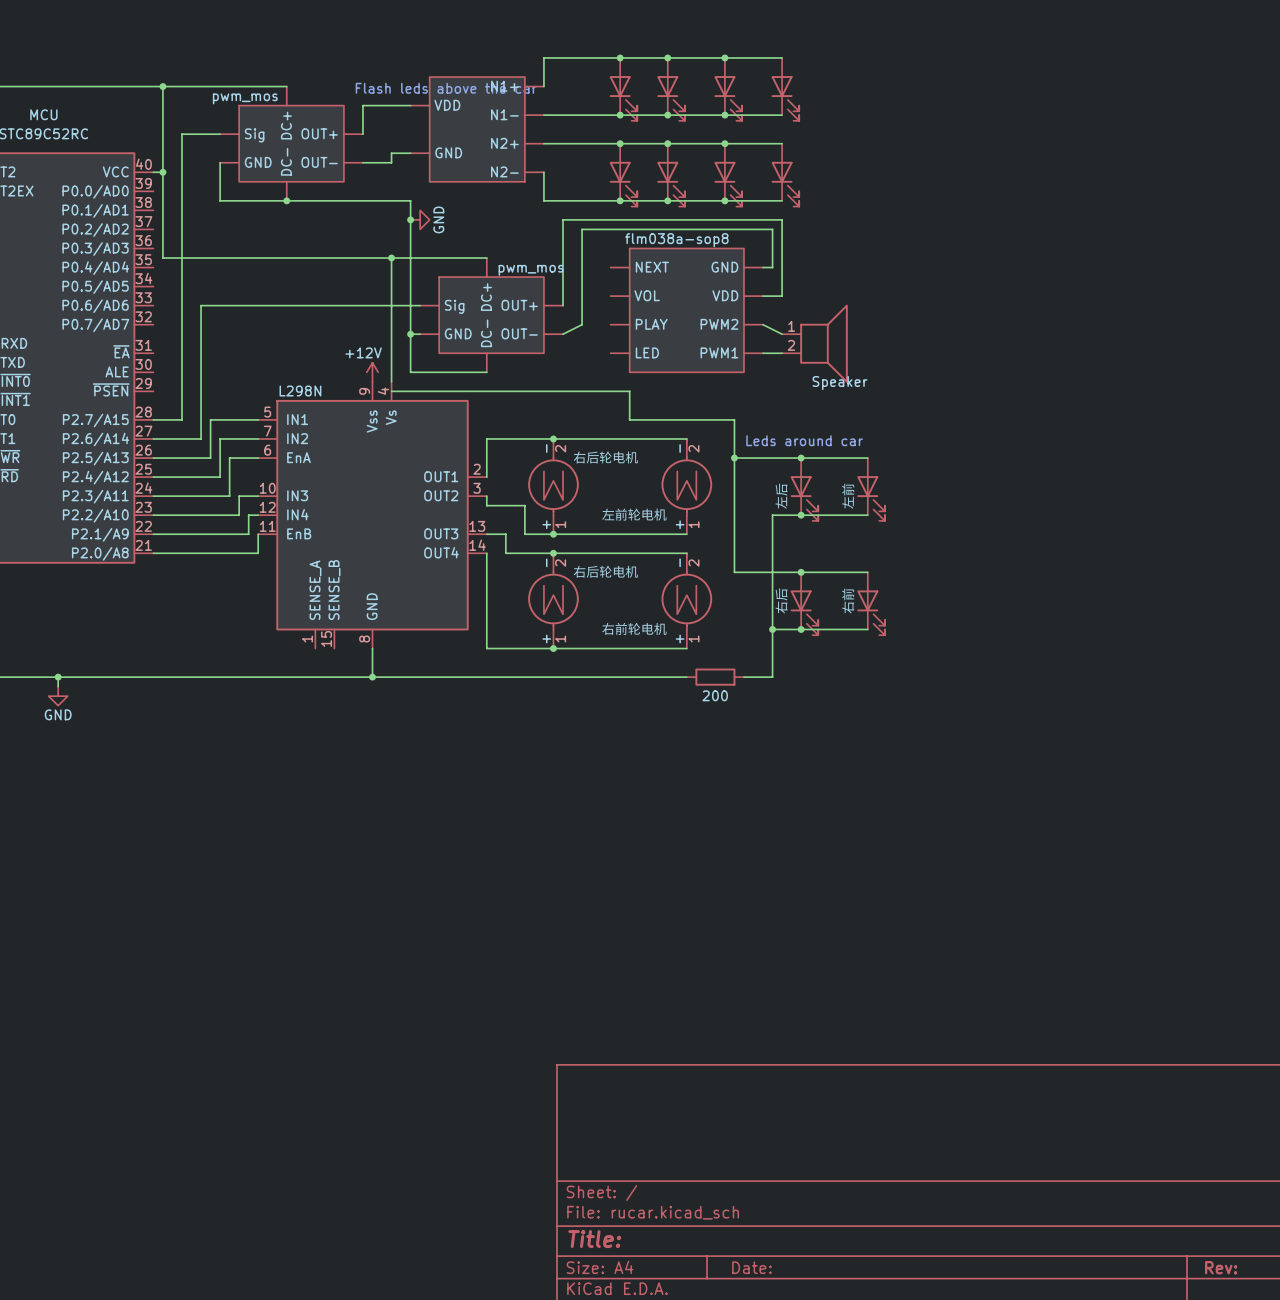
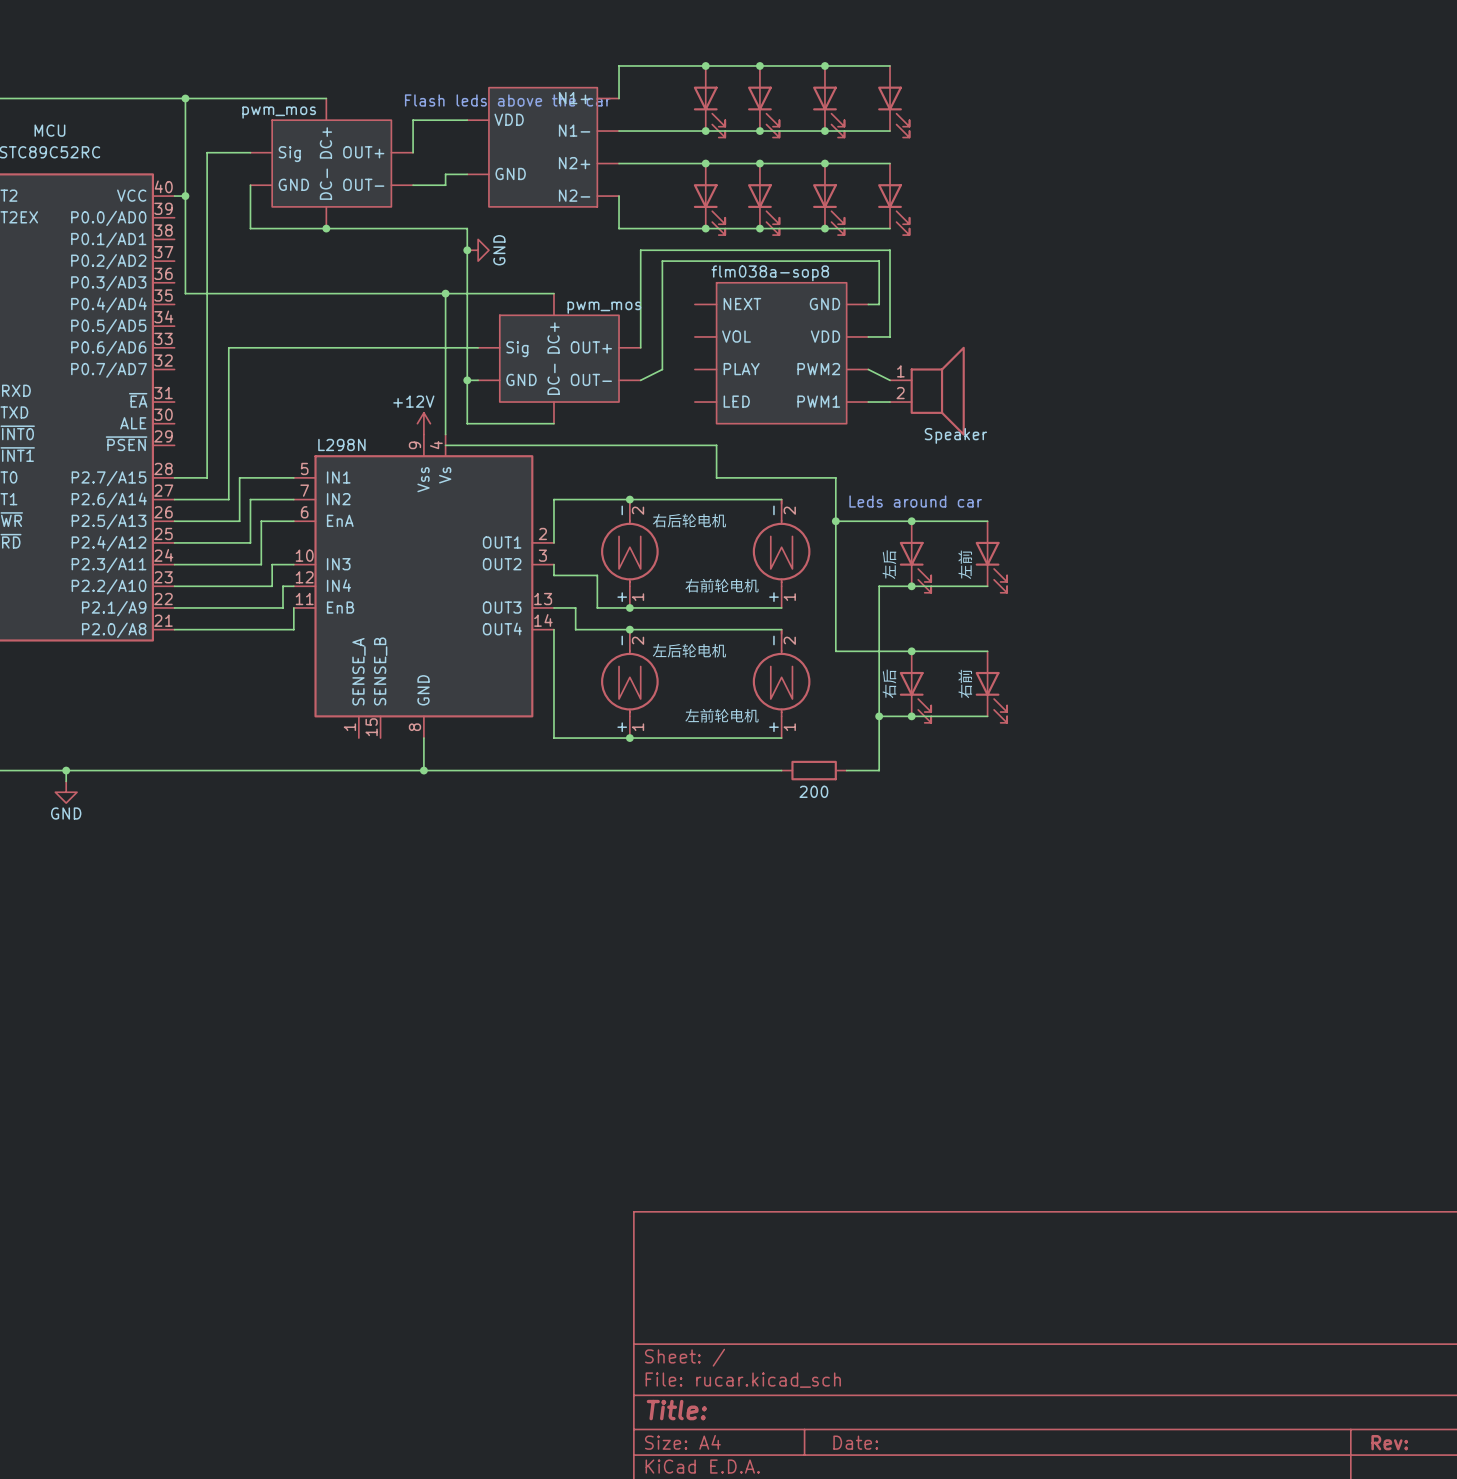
part value: 左前轮电机 (634, 514) -> 右前轮电机 (721, 585)
part value: 右后轮电机 (605, 571) -> 左后轮电机 (689, 650)
part value: 右前轮电机 (634, 628) -> 左前轮电机 (721, 715)

